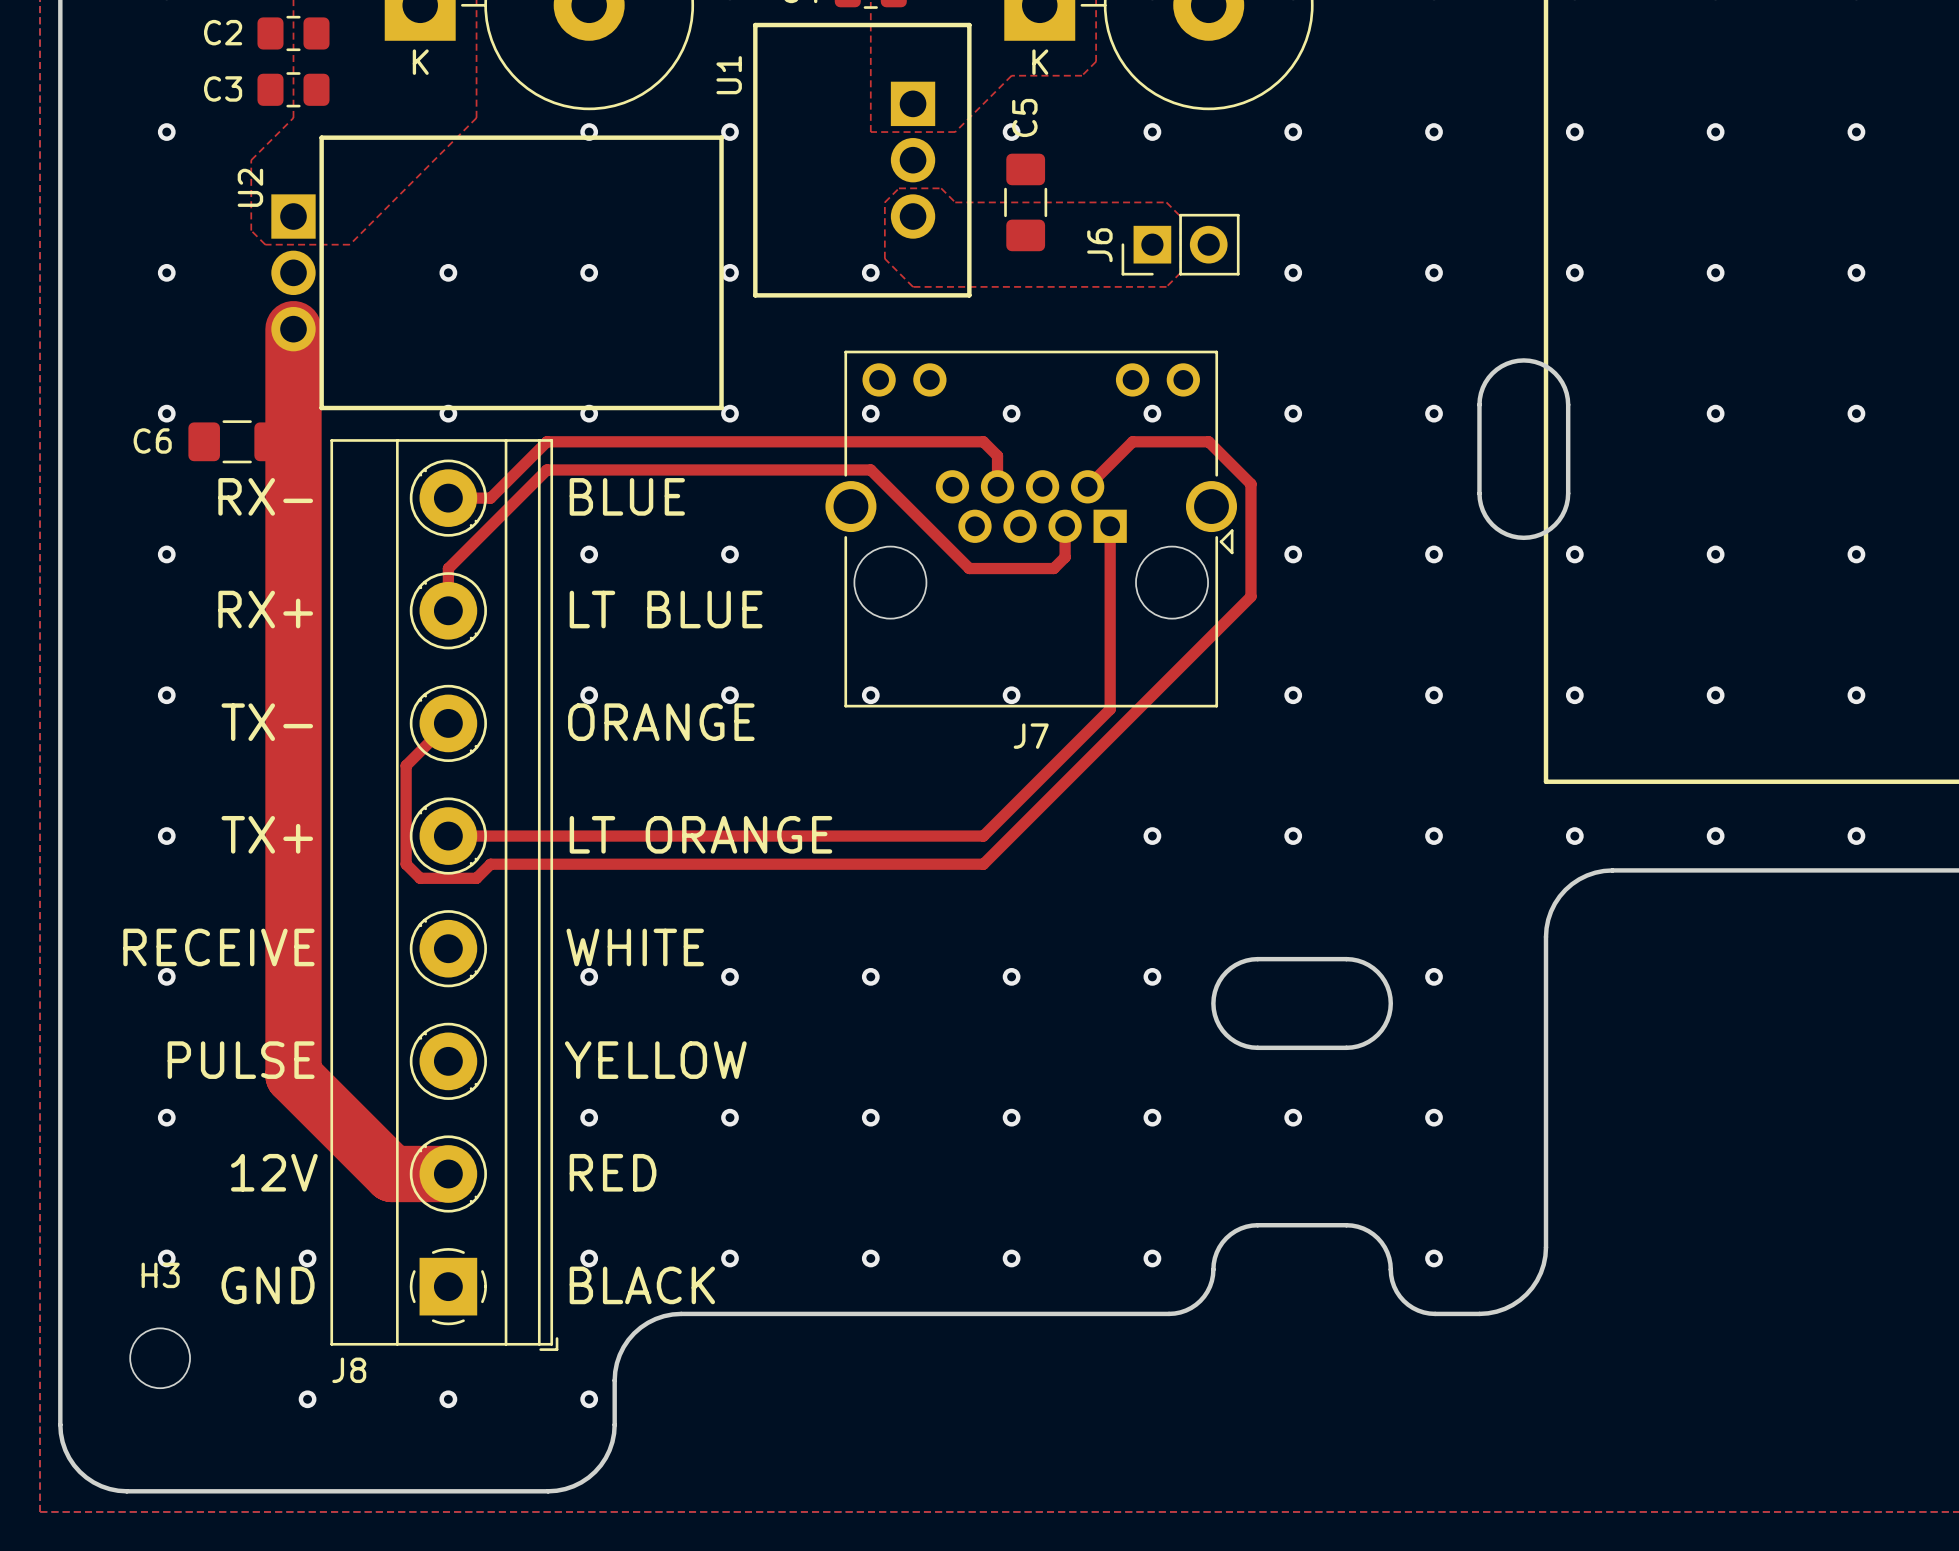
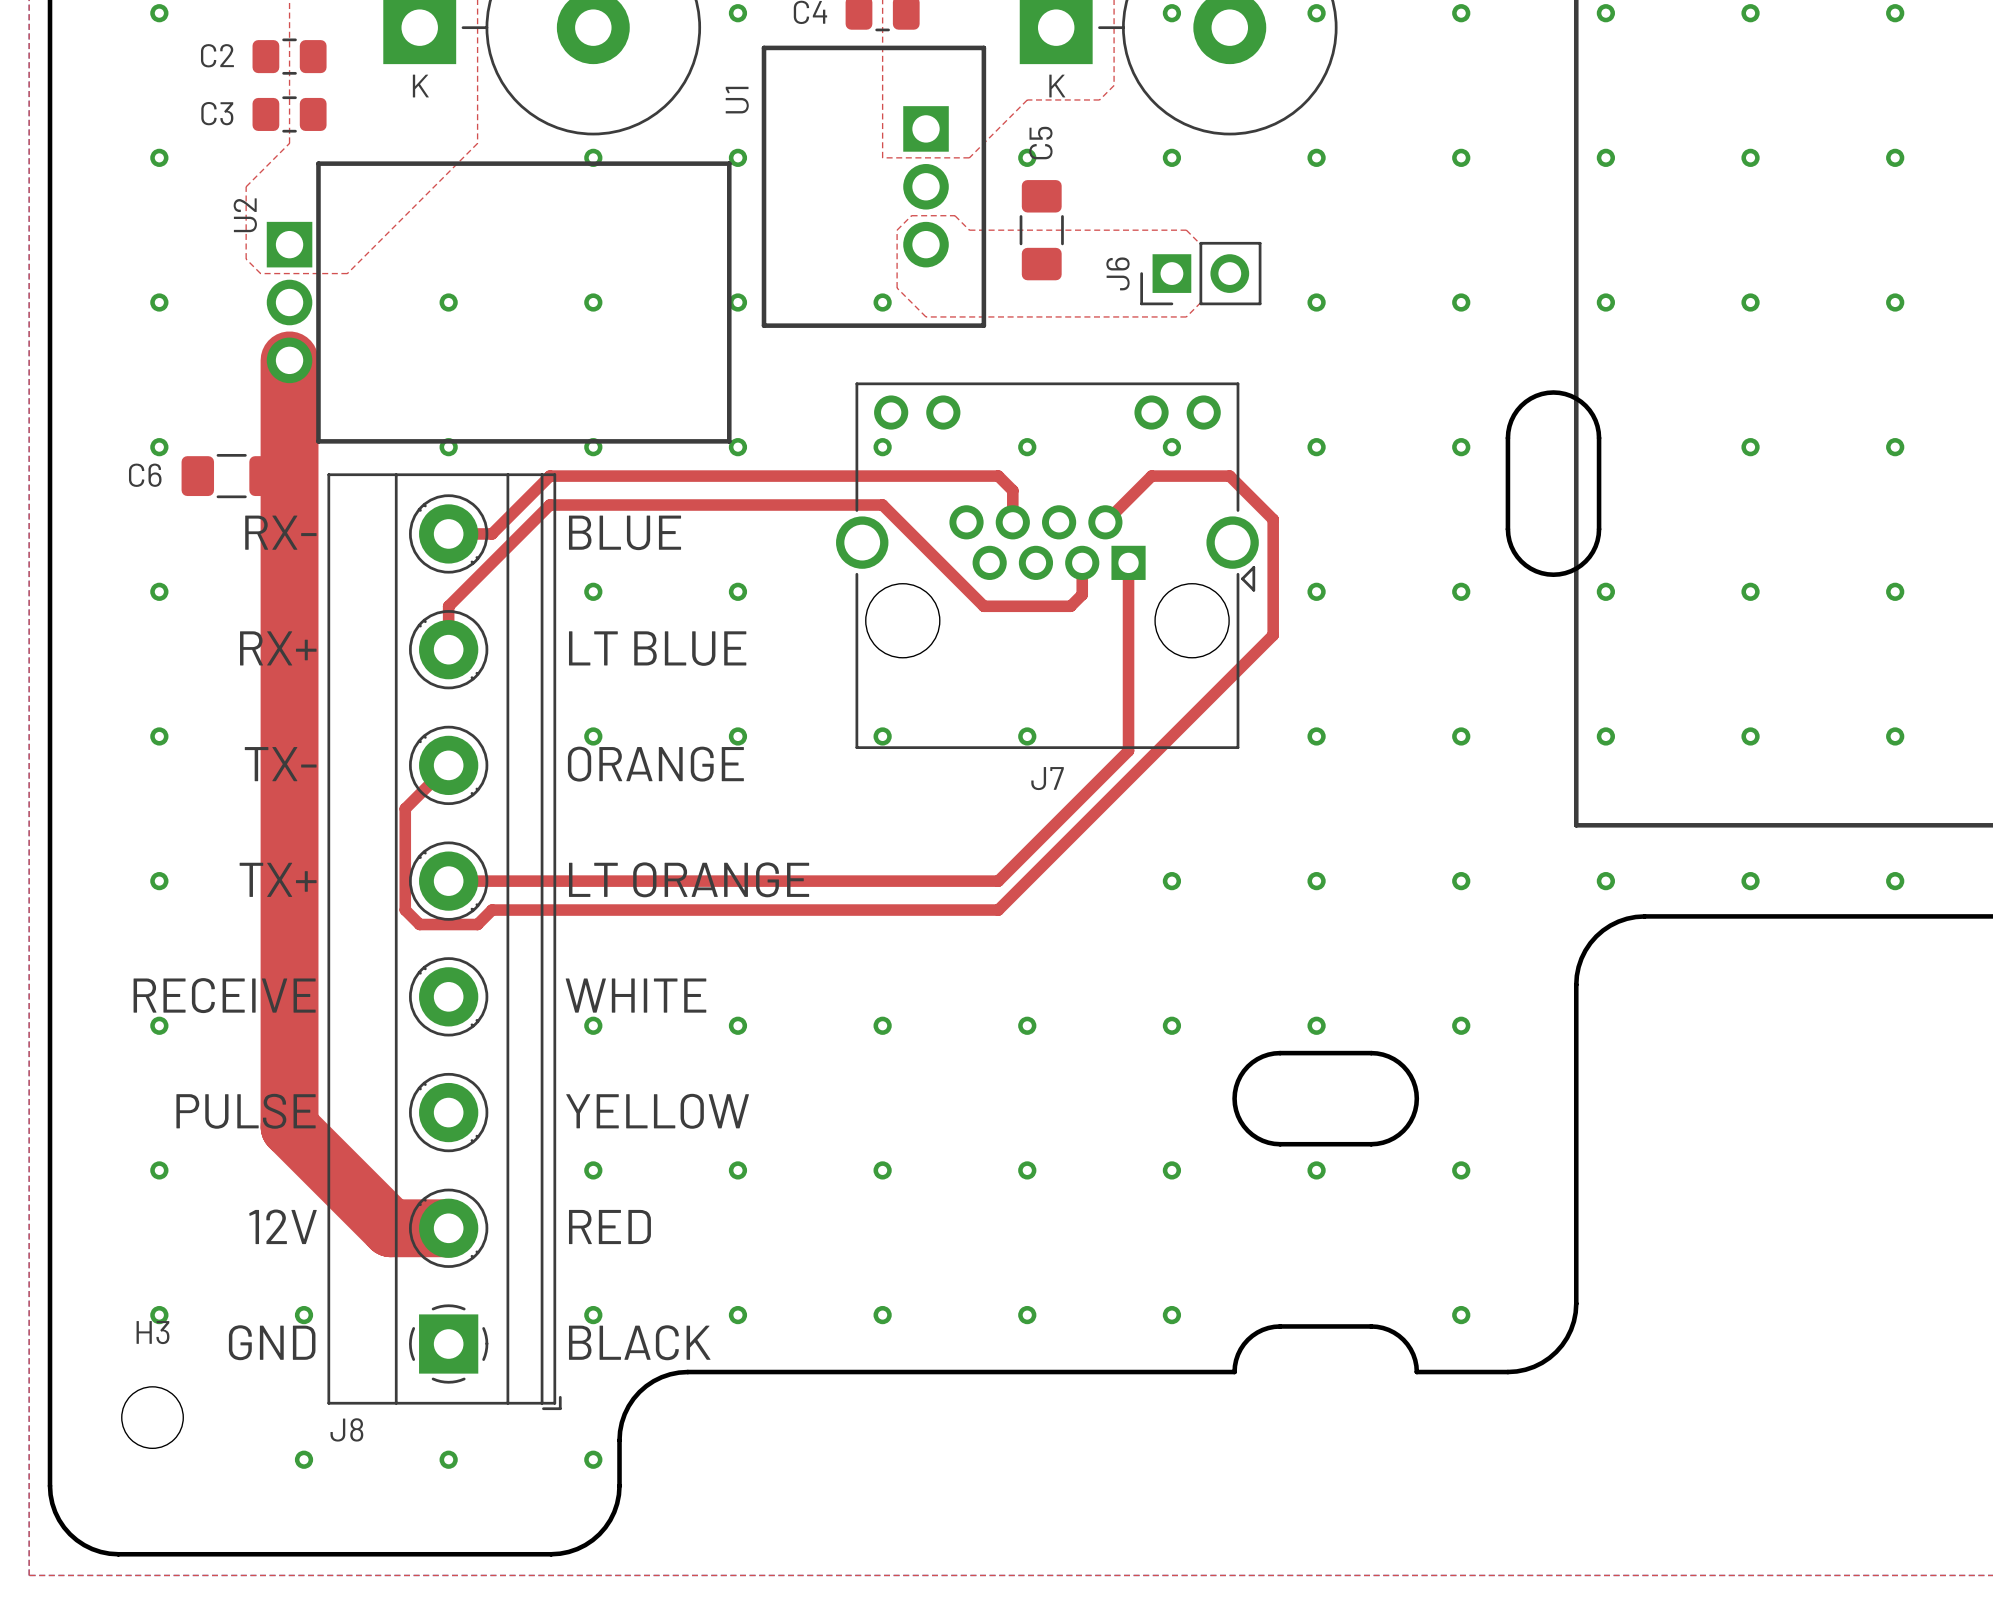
board edge: (1257, 959) (1346, 959) (1357, 960) (1368, 965) (1381, 976) (1389, 992) (1390, 1009) (1384, 1025) (1373, 1038) (1363, 1044) (1352, 1047) (1257, 1047) (1246, 1046) (1235, 1041) (1226, 1034) (1216, 1020) (1213, 1003) (1214, 992) (1219, 981) (1230, 968) (1240, 962) (1257, 959) -> (1280, 1053) (1371, 1053) (1383, 1054) (1394, 1059) (1407, 1070) (1415, 1086) (1416, 1104) (1410, 1121) (1398, 1134) (1388, 1140) (1377, 1143) (1280, 1144) (1268, 1142) (1257, 1138) (1247, 1130) (1238, 1116) (1234, 1098) (1236, 1086) (1240, 1075) (1252, 1062) (1262, 1056) (1280, 1053)
via: none -> (1316, 1025)
board edge: (1169, 1313) (1186, 1310) (1200, 1300) (1210, 1286) (1214, 1258) (1222, 1242) (1230, 1234) (1240, 1228) (1257, 1225) (1346, 1225) (1357, 1226) (1368, 1231) (1377, 1238) (1387, 1252) (1392, 1281) (1399, 1296) (1408, 1304) (1418, 1310) (1435, 1313) -> (1189, 1372) (1234, 1372) (1238, 1354) (1247, 1339) (1262, 1329) (1280, 1326) (1383, 1328) (1398, 1335) (1407, 1344) (1413, 1354) (1416, 1372) (1462, 1372)

